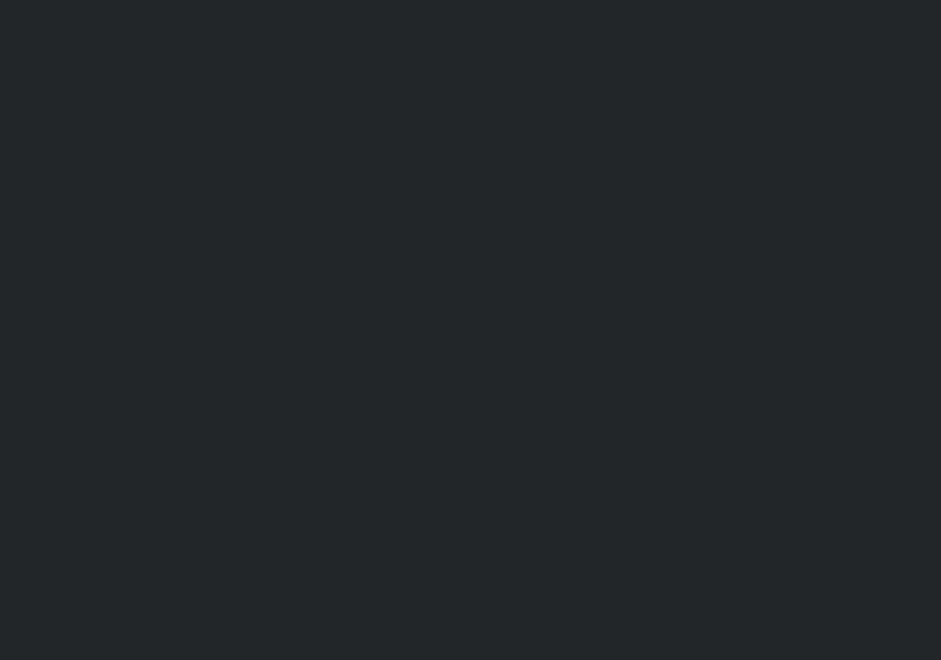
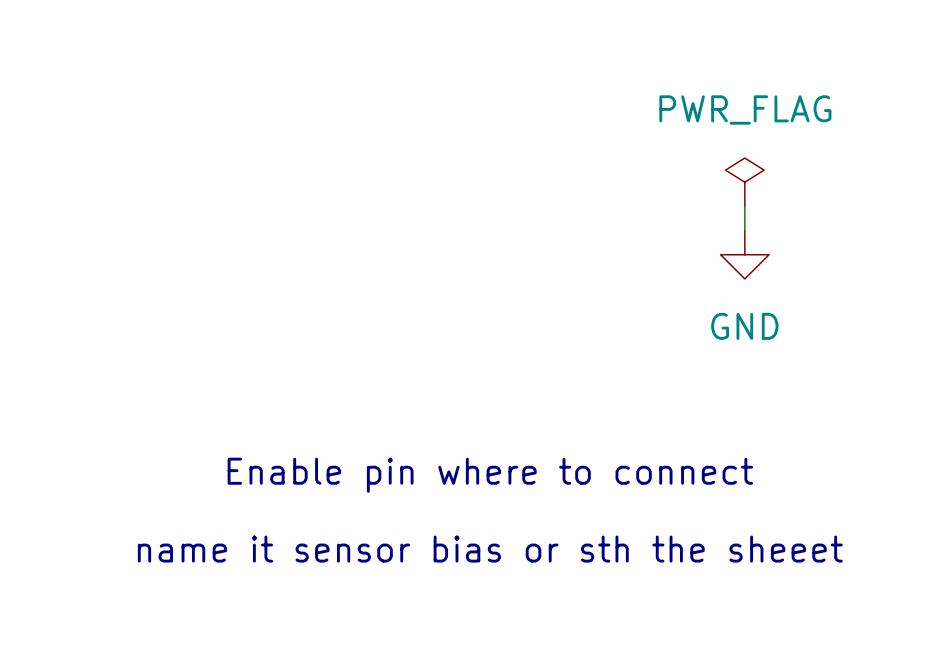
power symbol: none -> PWR_FLAG (744, 182)
wire: none -> (744, 206) (744, 230)
power symbol: none -> GND (744, 254)
text: none -> Enable pin where to connect (490, 475)
text: none -> name it sensor bias or sth the sheeet (490, 549)

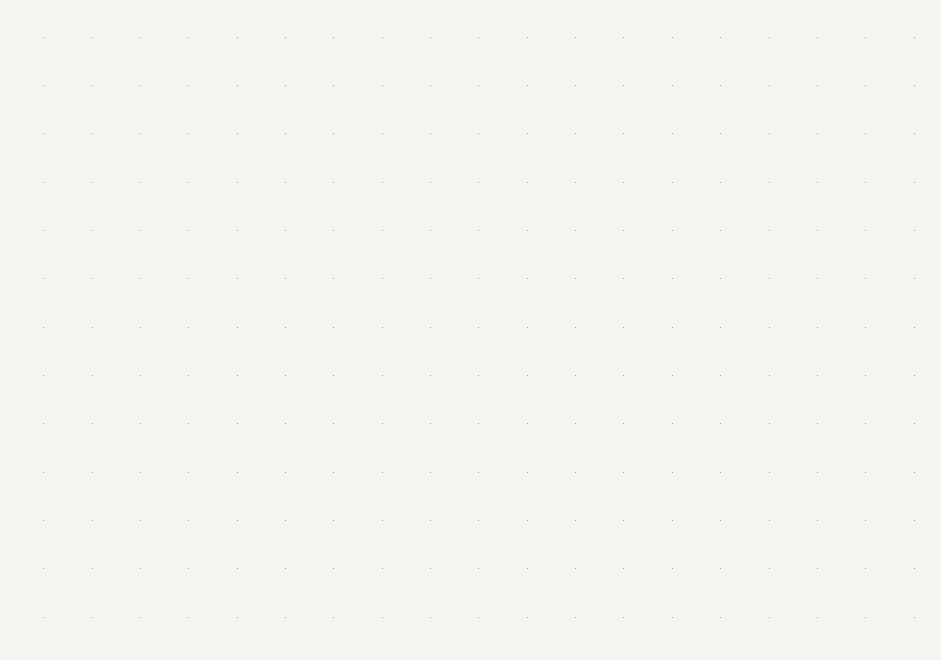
power symbol: PWR_FLAG (744, 182) -> none
wire: (744, 206) (744, 230) -> none
power symbol: GND (744, 254) -> none
text: Enable pin where to connect (490, 475) -> none
text: name it sensor bias or sth the sheeet (490, 549) -> none

